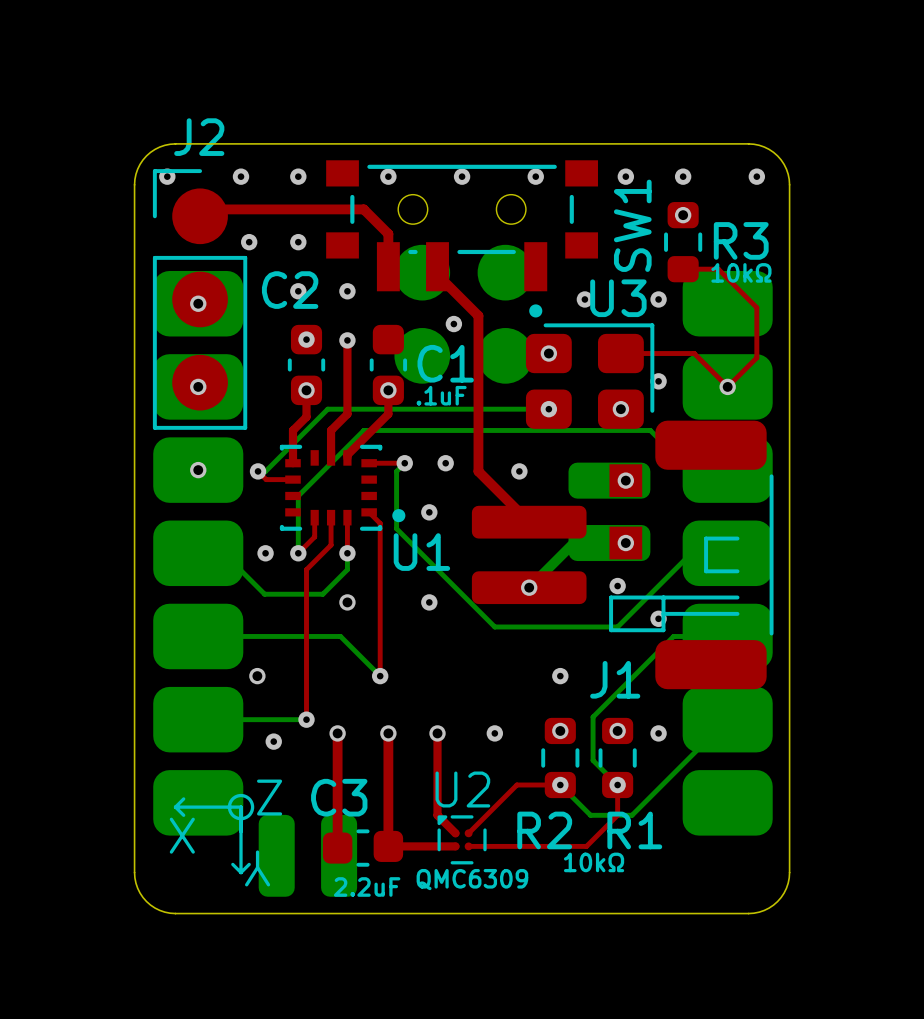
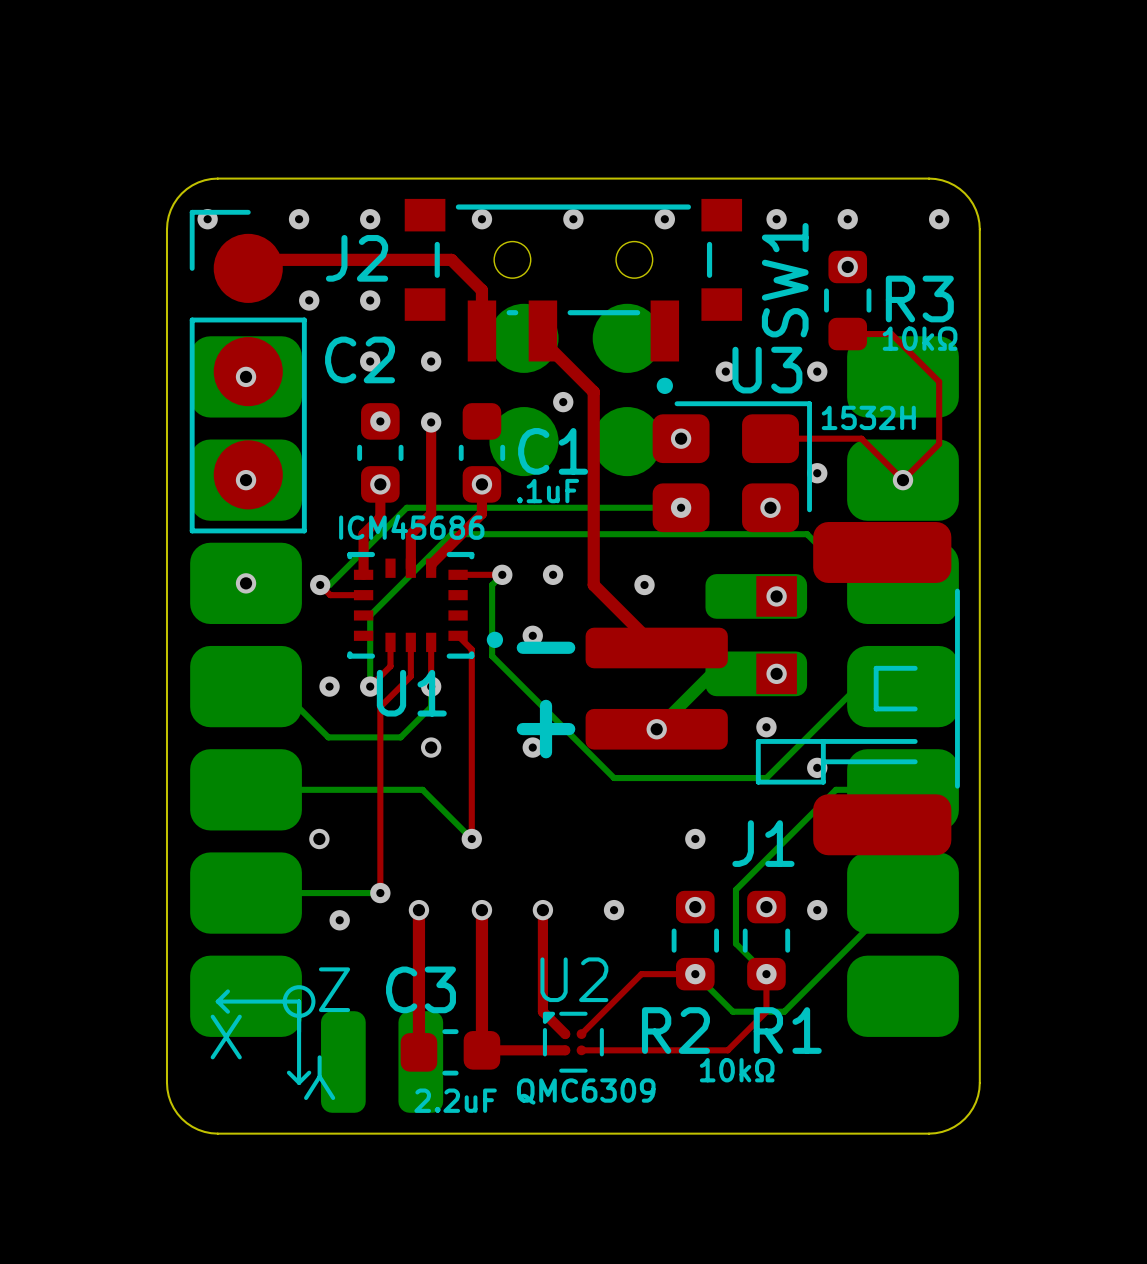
J2 name position: J2 (199, 137) -> J2 (357, 258)
text: none -> 1532H (868, 417)
text: none -> ICM45686 (411, 527)
text: none -> - (546, 647)
U1 name position: U1 (421, 552) -> U1 (411, 693)
text: none -> + (546, 729)

